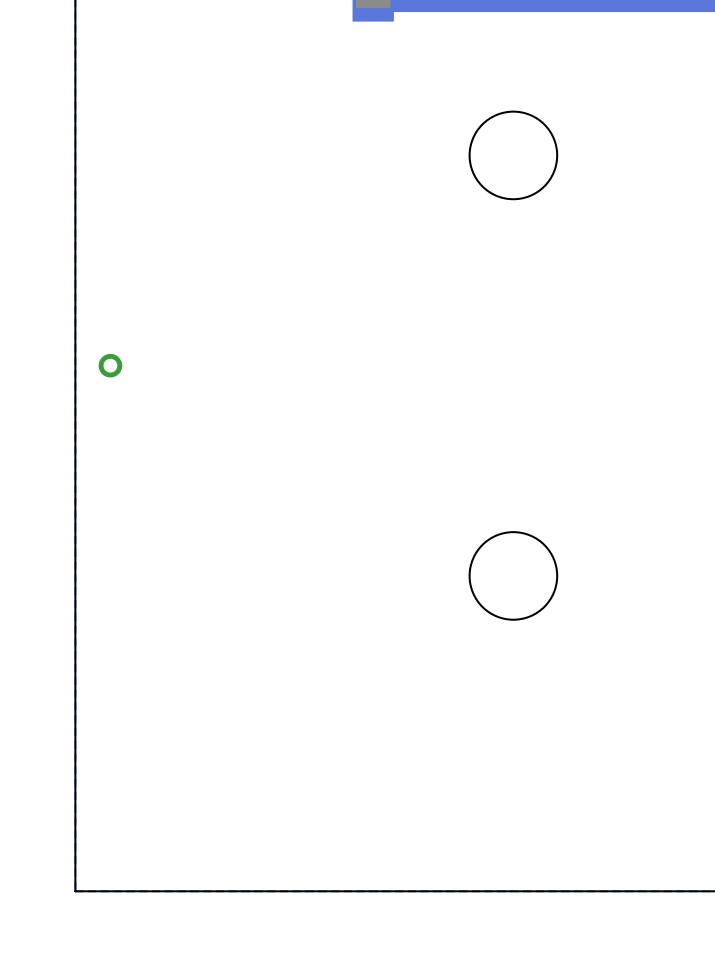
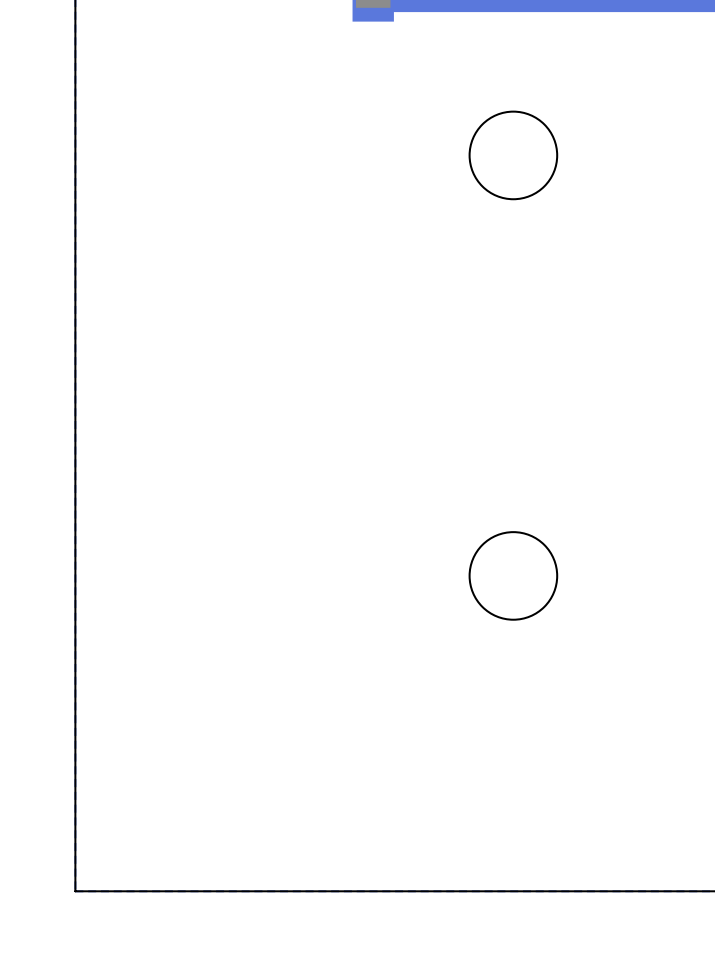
via: (110, 365) -> none

